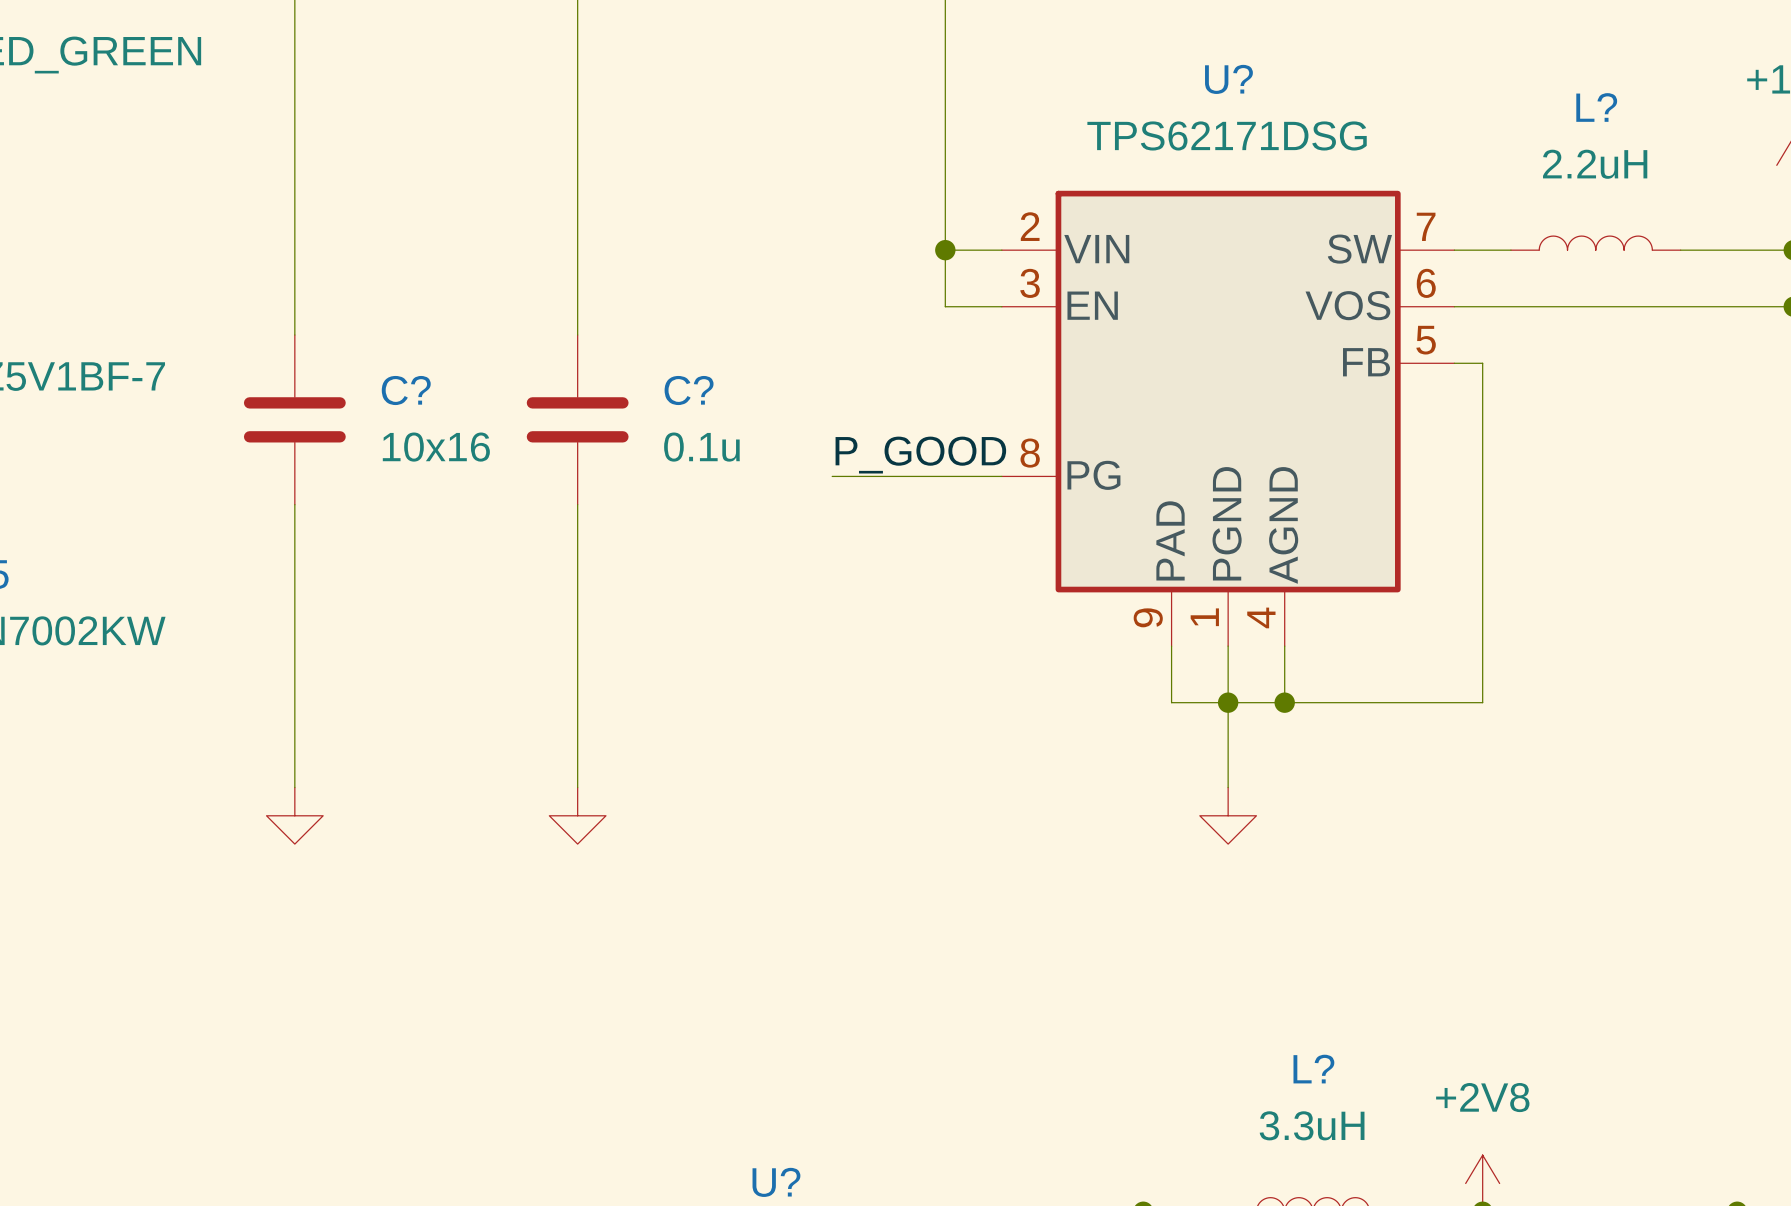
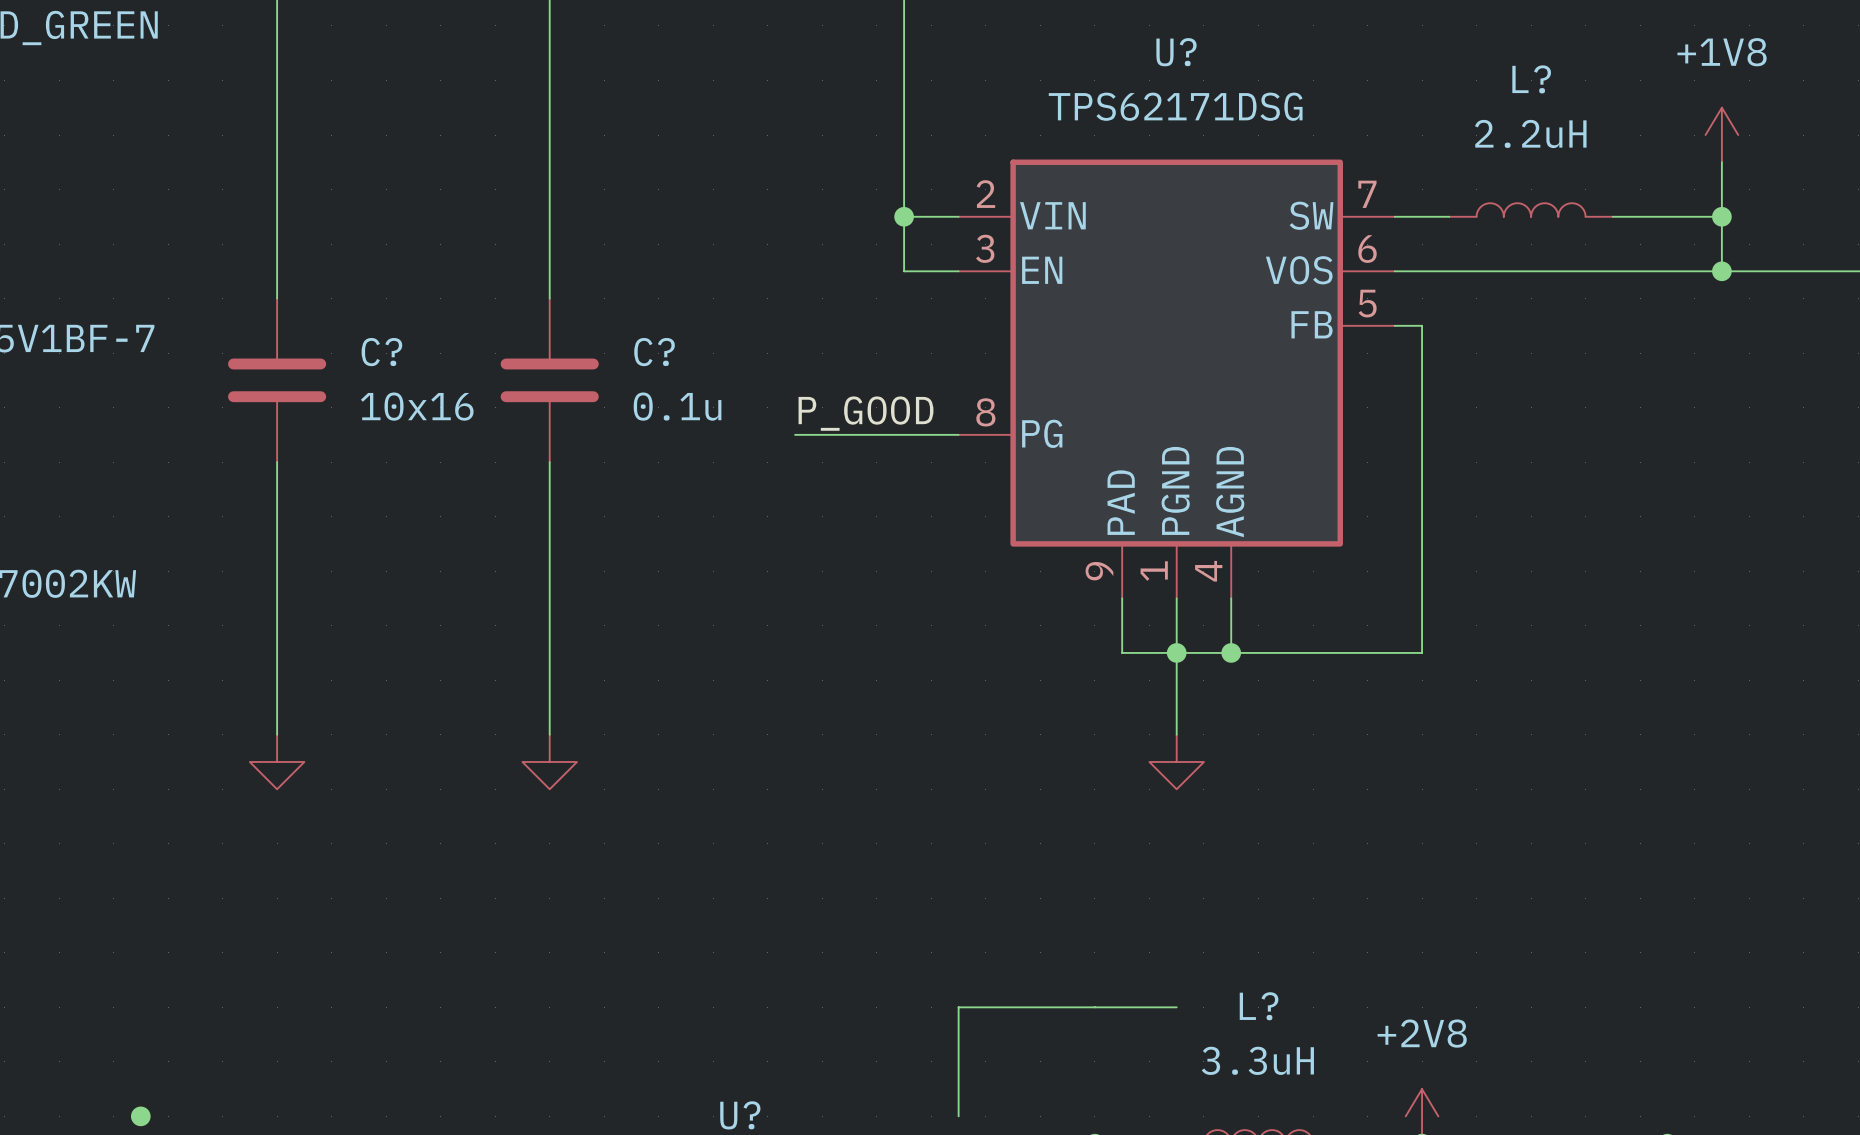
wire: none -> (1176, 1007) (958, 1007) (958, 1116)
junction: none -> (140, 1116)

